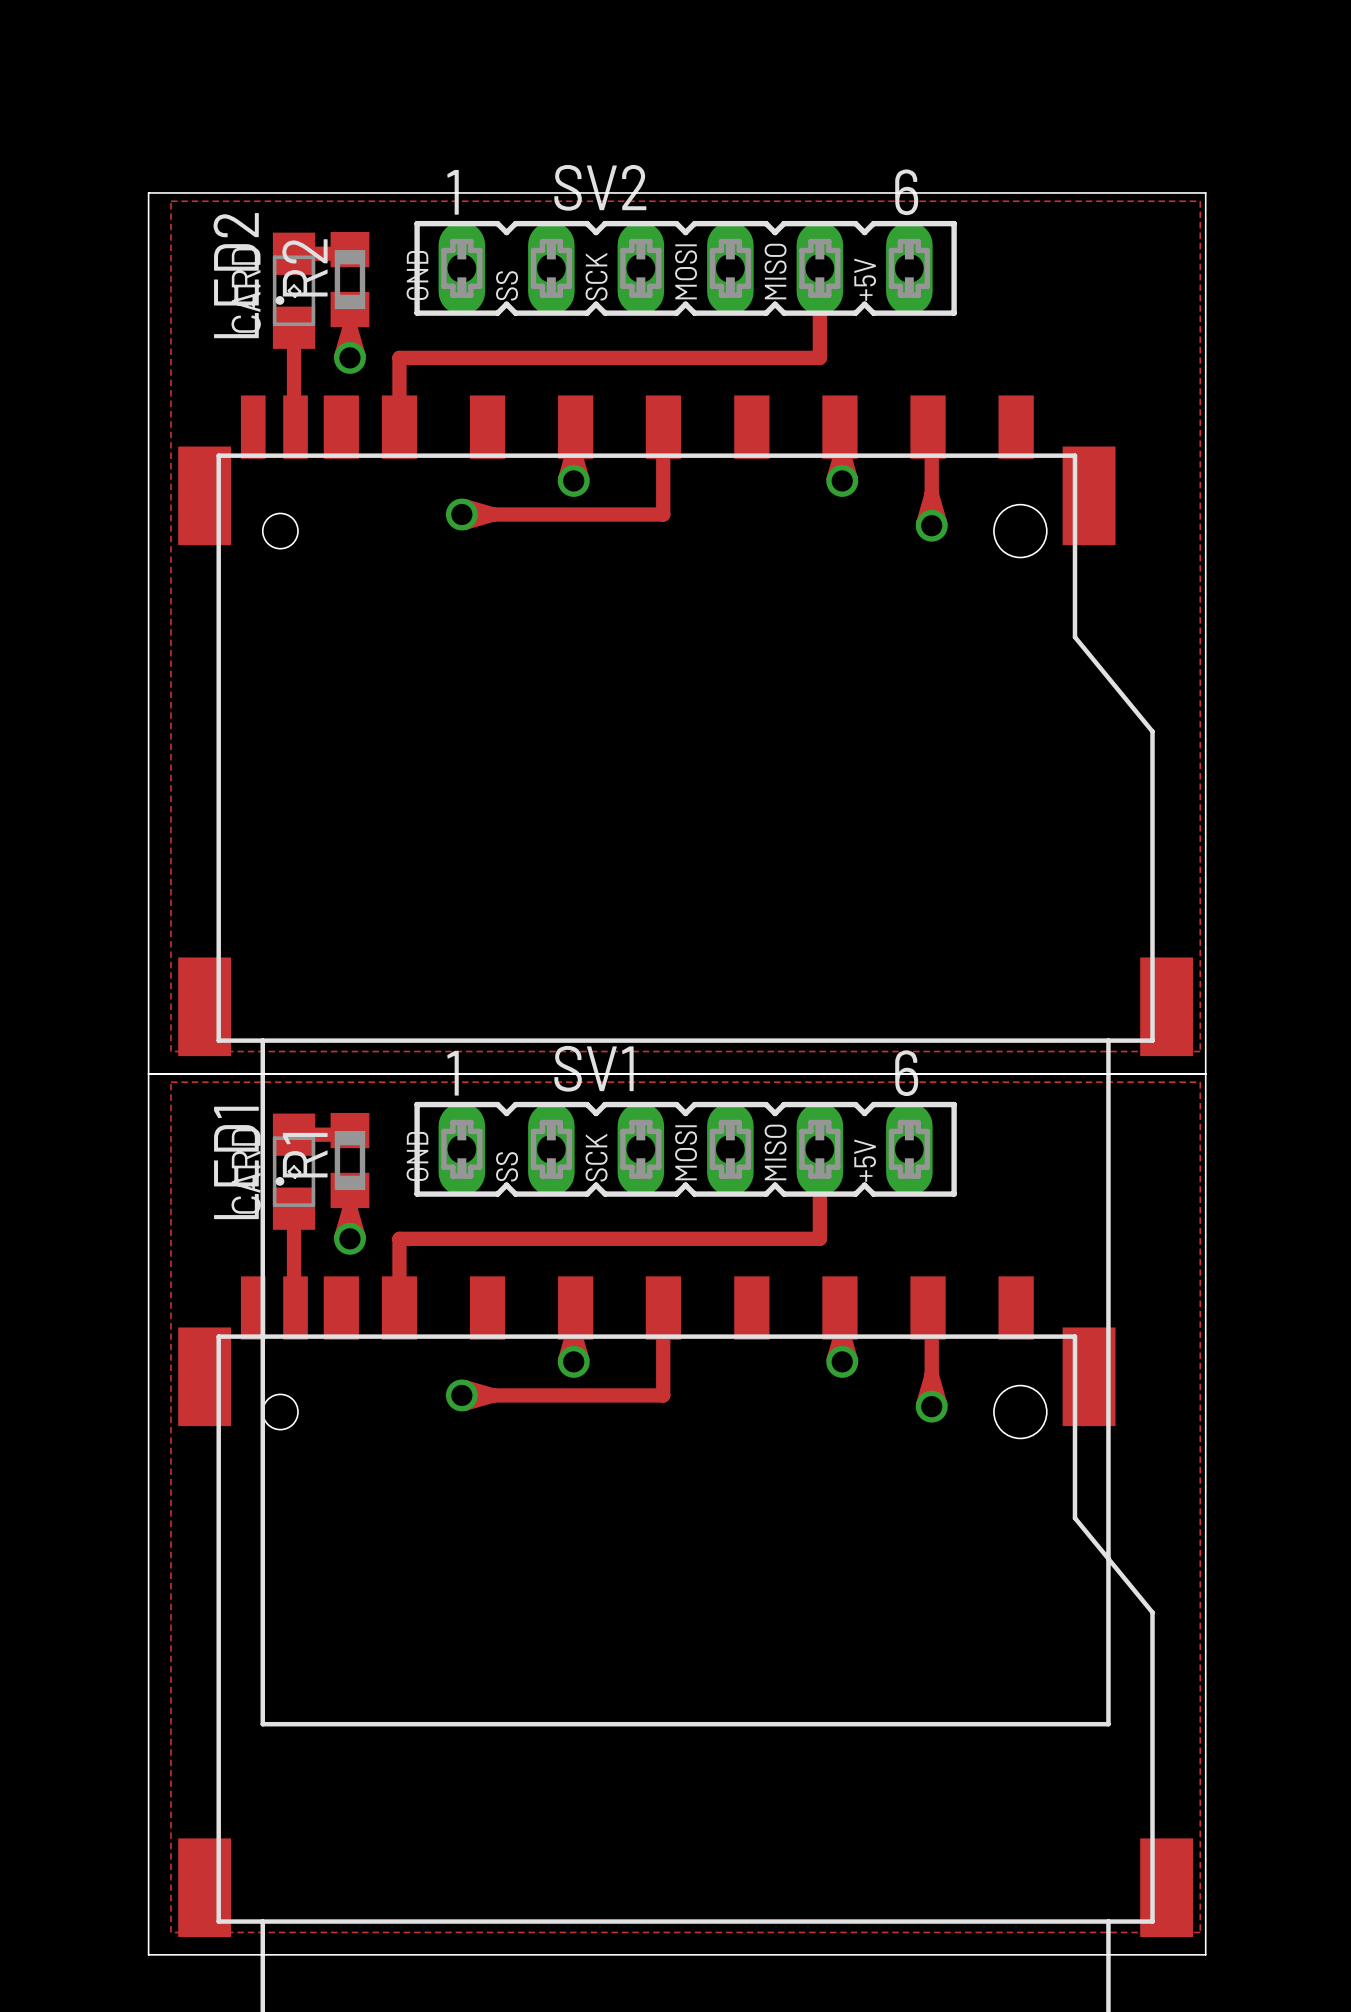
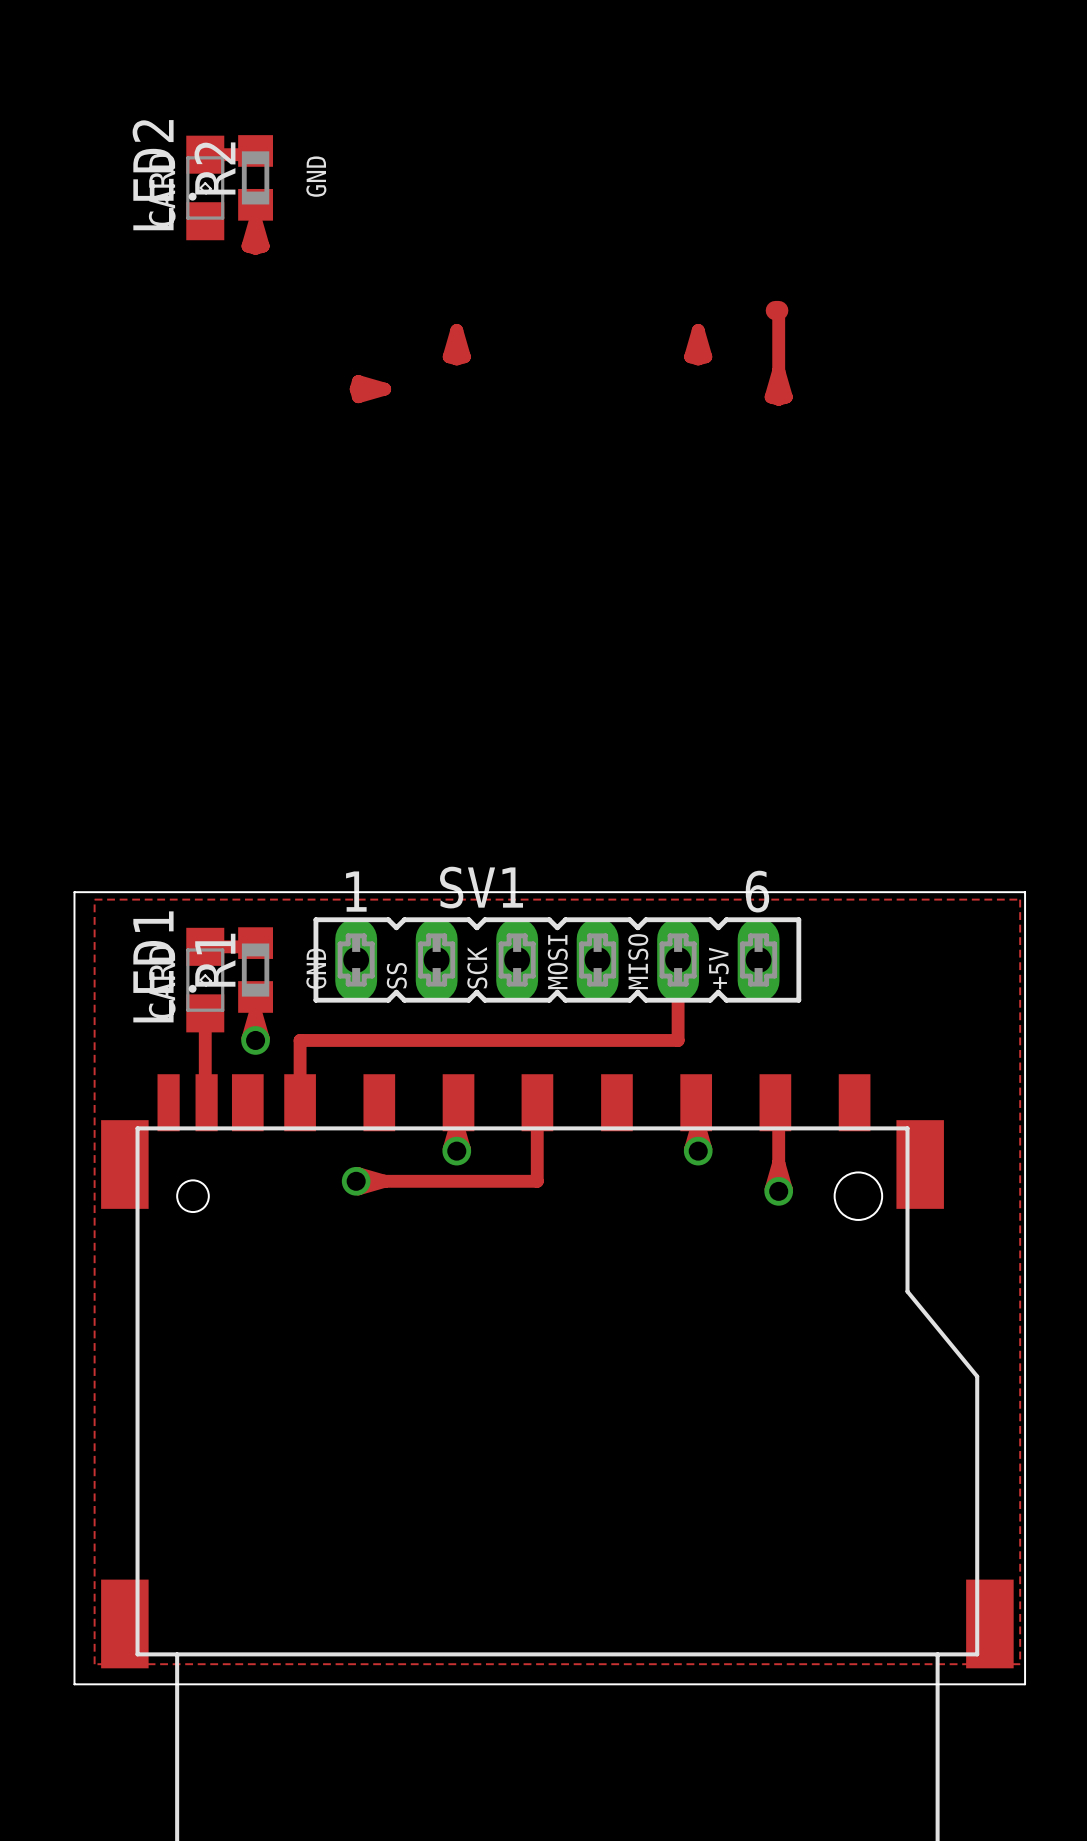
zone outline: (170, 201) (1200, 201) (1200, 1051) (170, 1051) (170, 201) -> none
SV2: (685, 268) -> none
track: (819, 268) (819, 357) (399, 357) (399, 427) -> none
text: MOSI (686, 271) -> none
text: MISO (775, 271) -> none
text: SCK (596, 276) -> none
text: +5V (865, 279) -> none
text: SS (507, 285) -> none
track: (294, 327) (295, 427) -> none
via: (349, 357) -> none
track: (663, 427) (663, 514) (461, 514) -> none
via: (573, 480) -> none
via: (842, 480) -> none
via: (461, 514) -> none
via: (931, 525) -> none
part: (685, 1060) -> none
board edge: (148, 1073) (148, 192) (1205, 192) (1205, 1073) -> none

